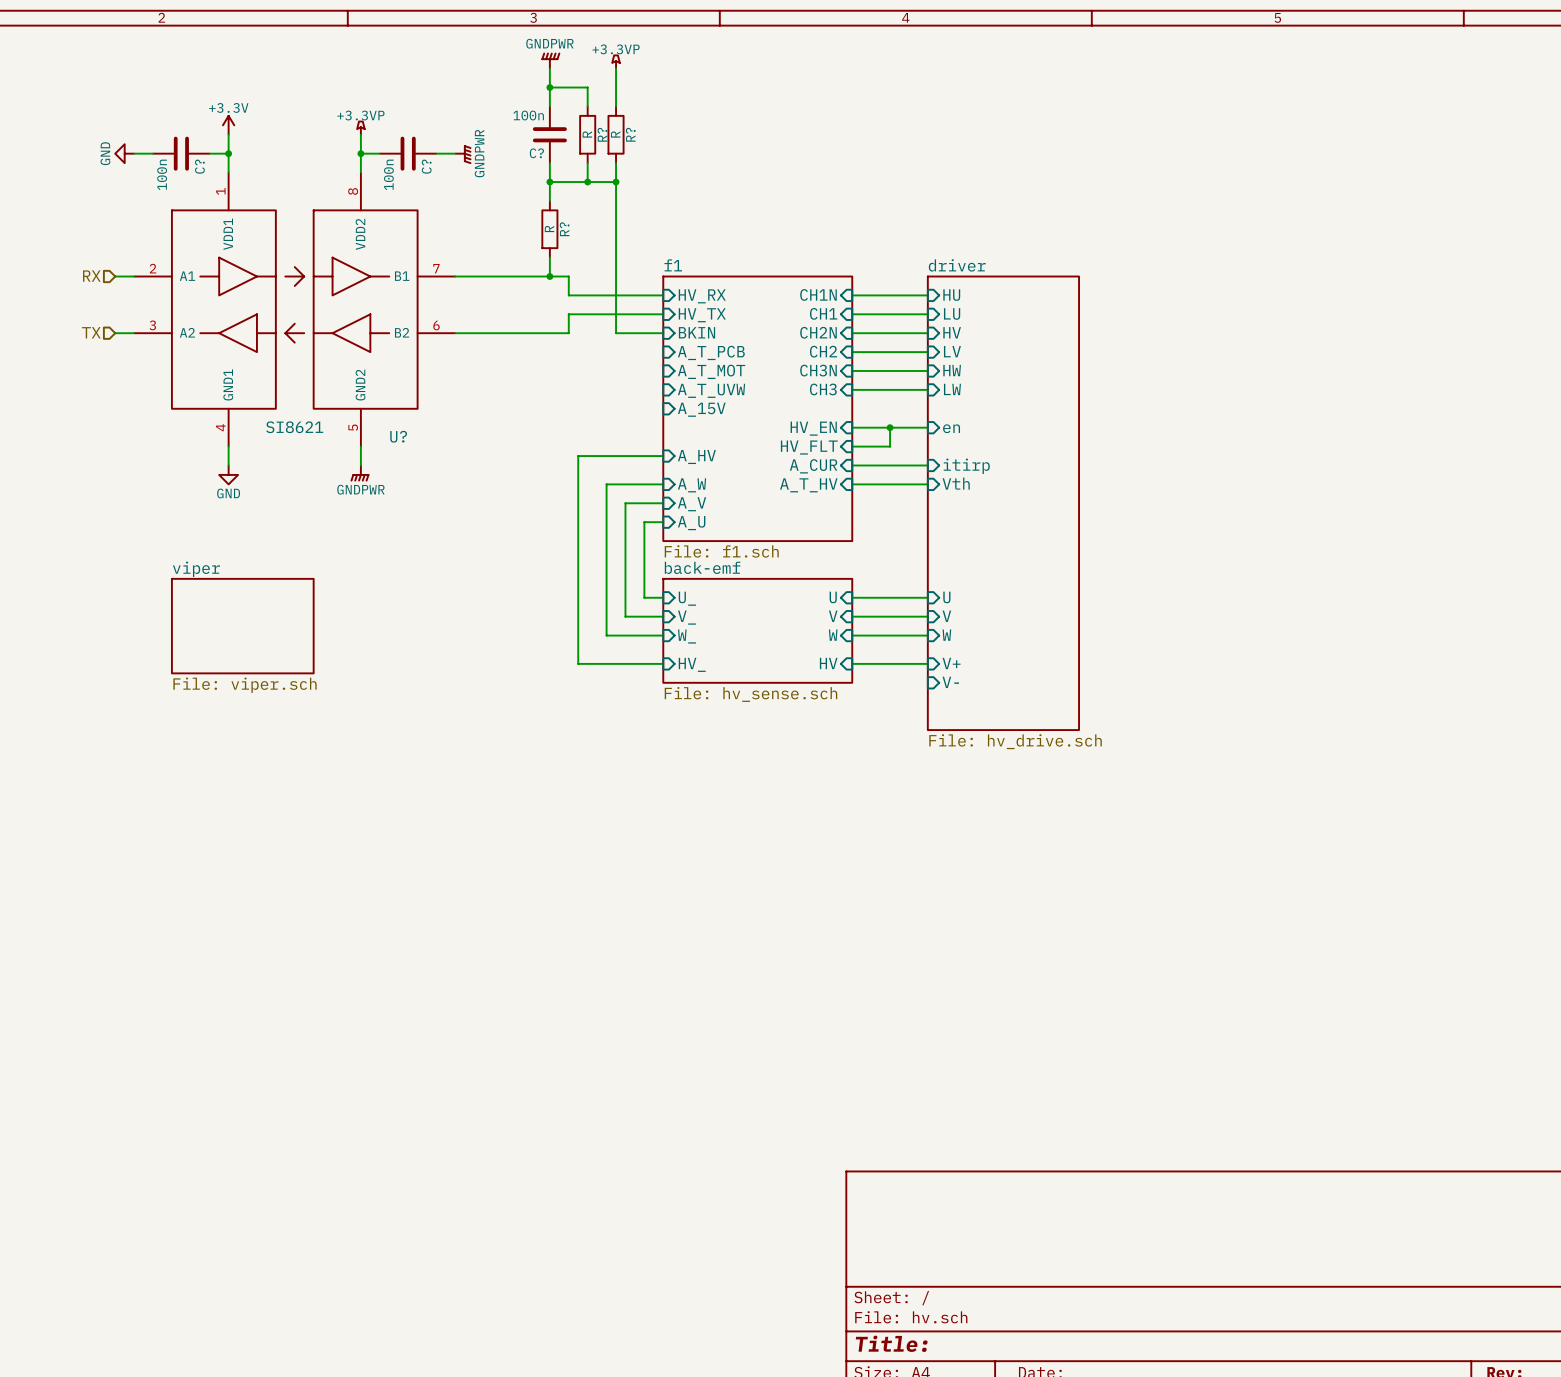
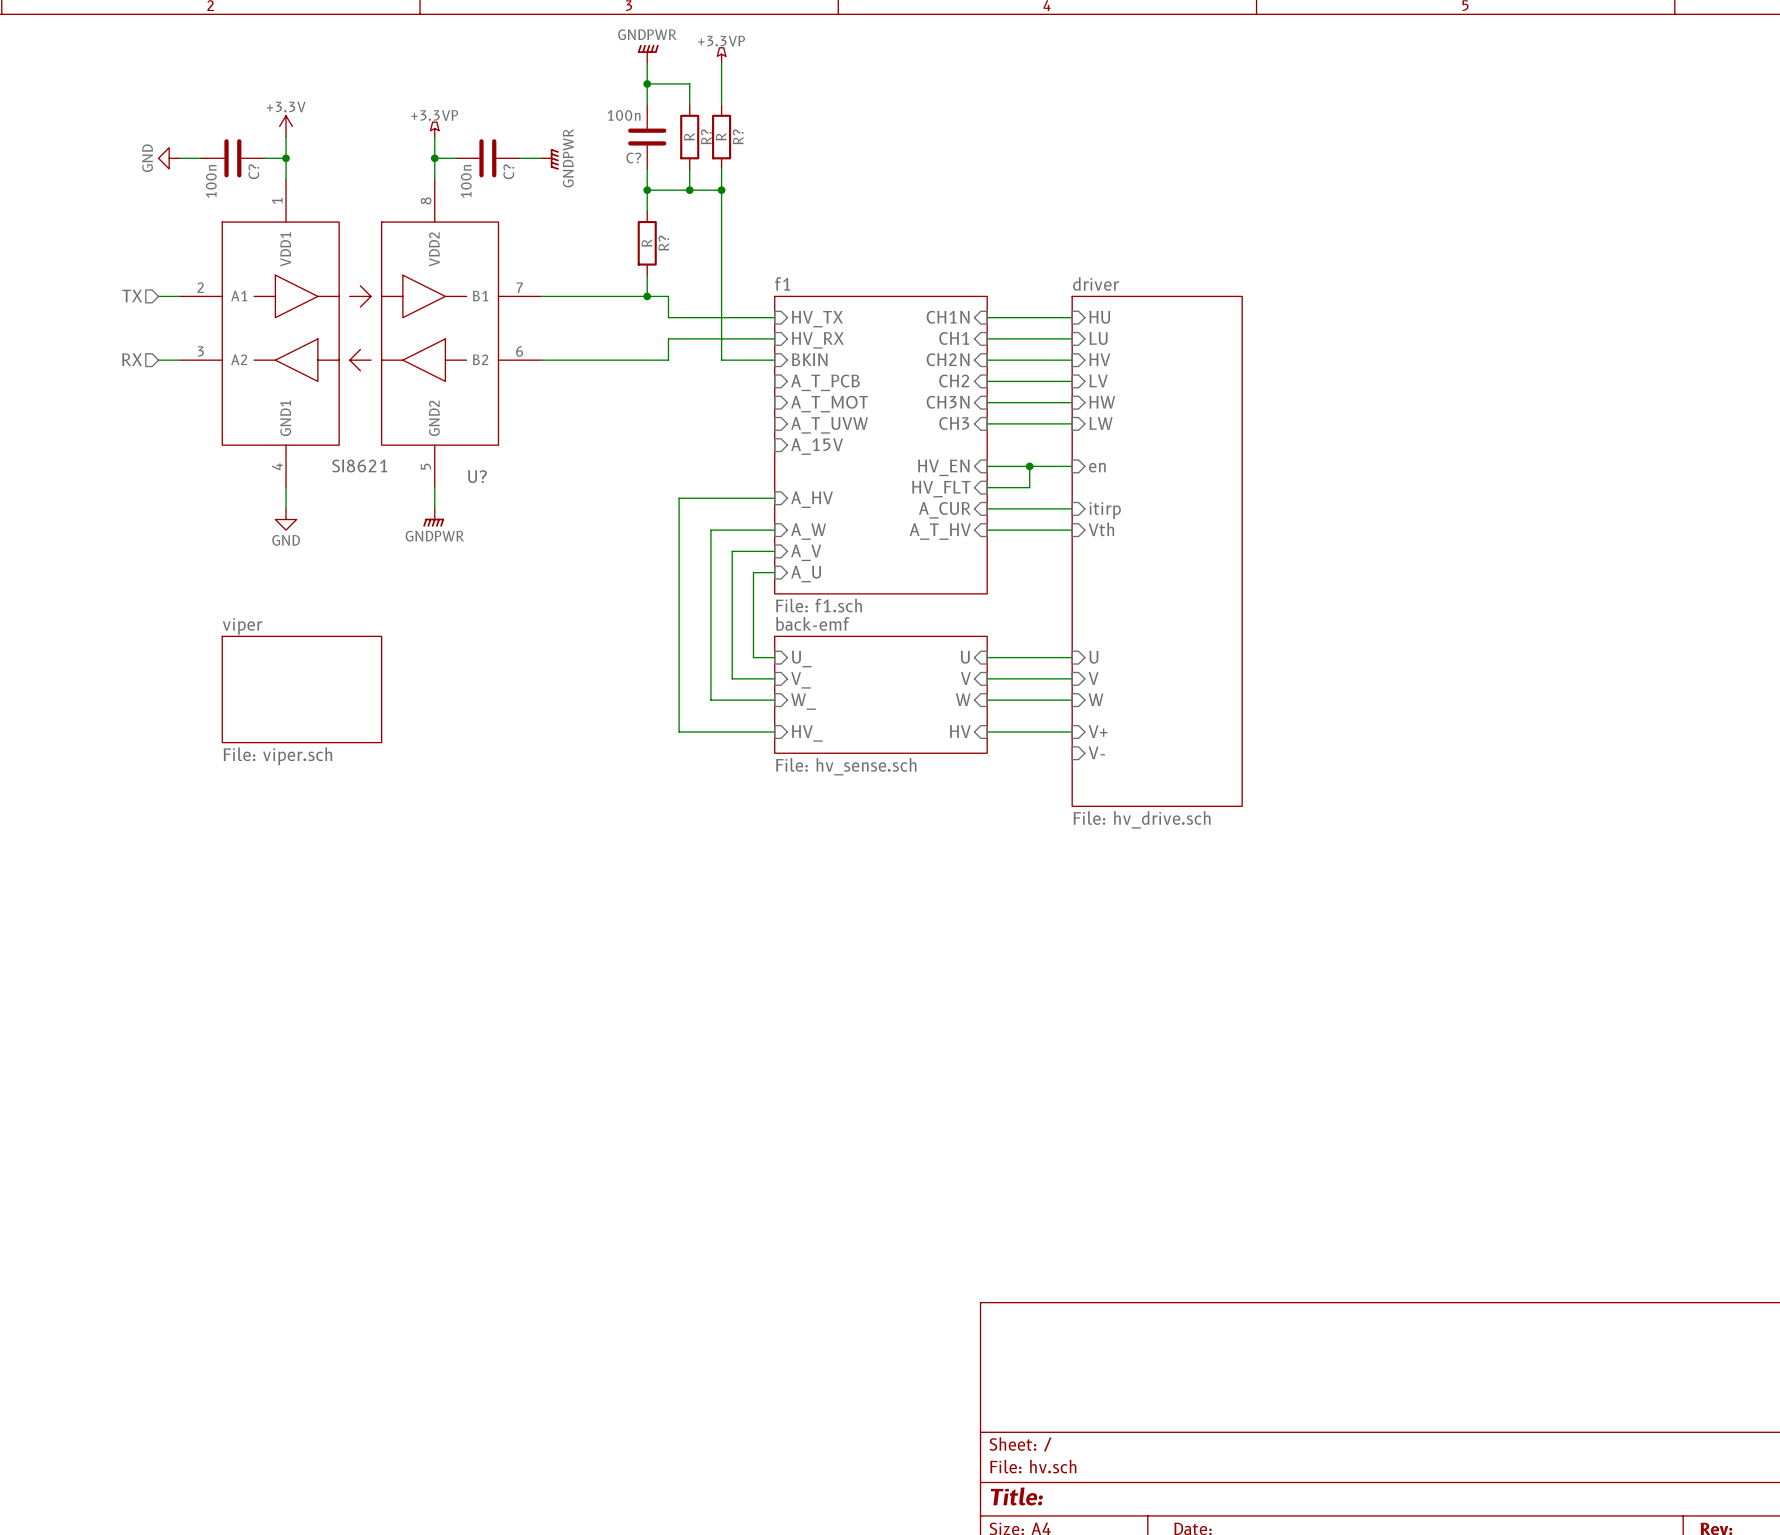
hierarchical label: RX (91, 276) -> TX (132, 295)
sheet pin: HV_RX (702, 296) -> HV_TX (817, 319)
sheet pin: HV_TX (702, 315) -> HV_RX (817, 340)
hierarchical label: TX (91, 332) -> RX (132, 359)

